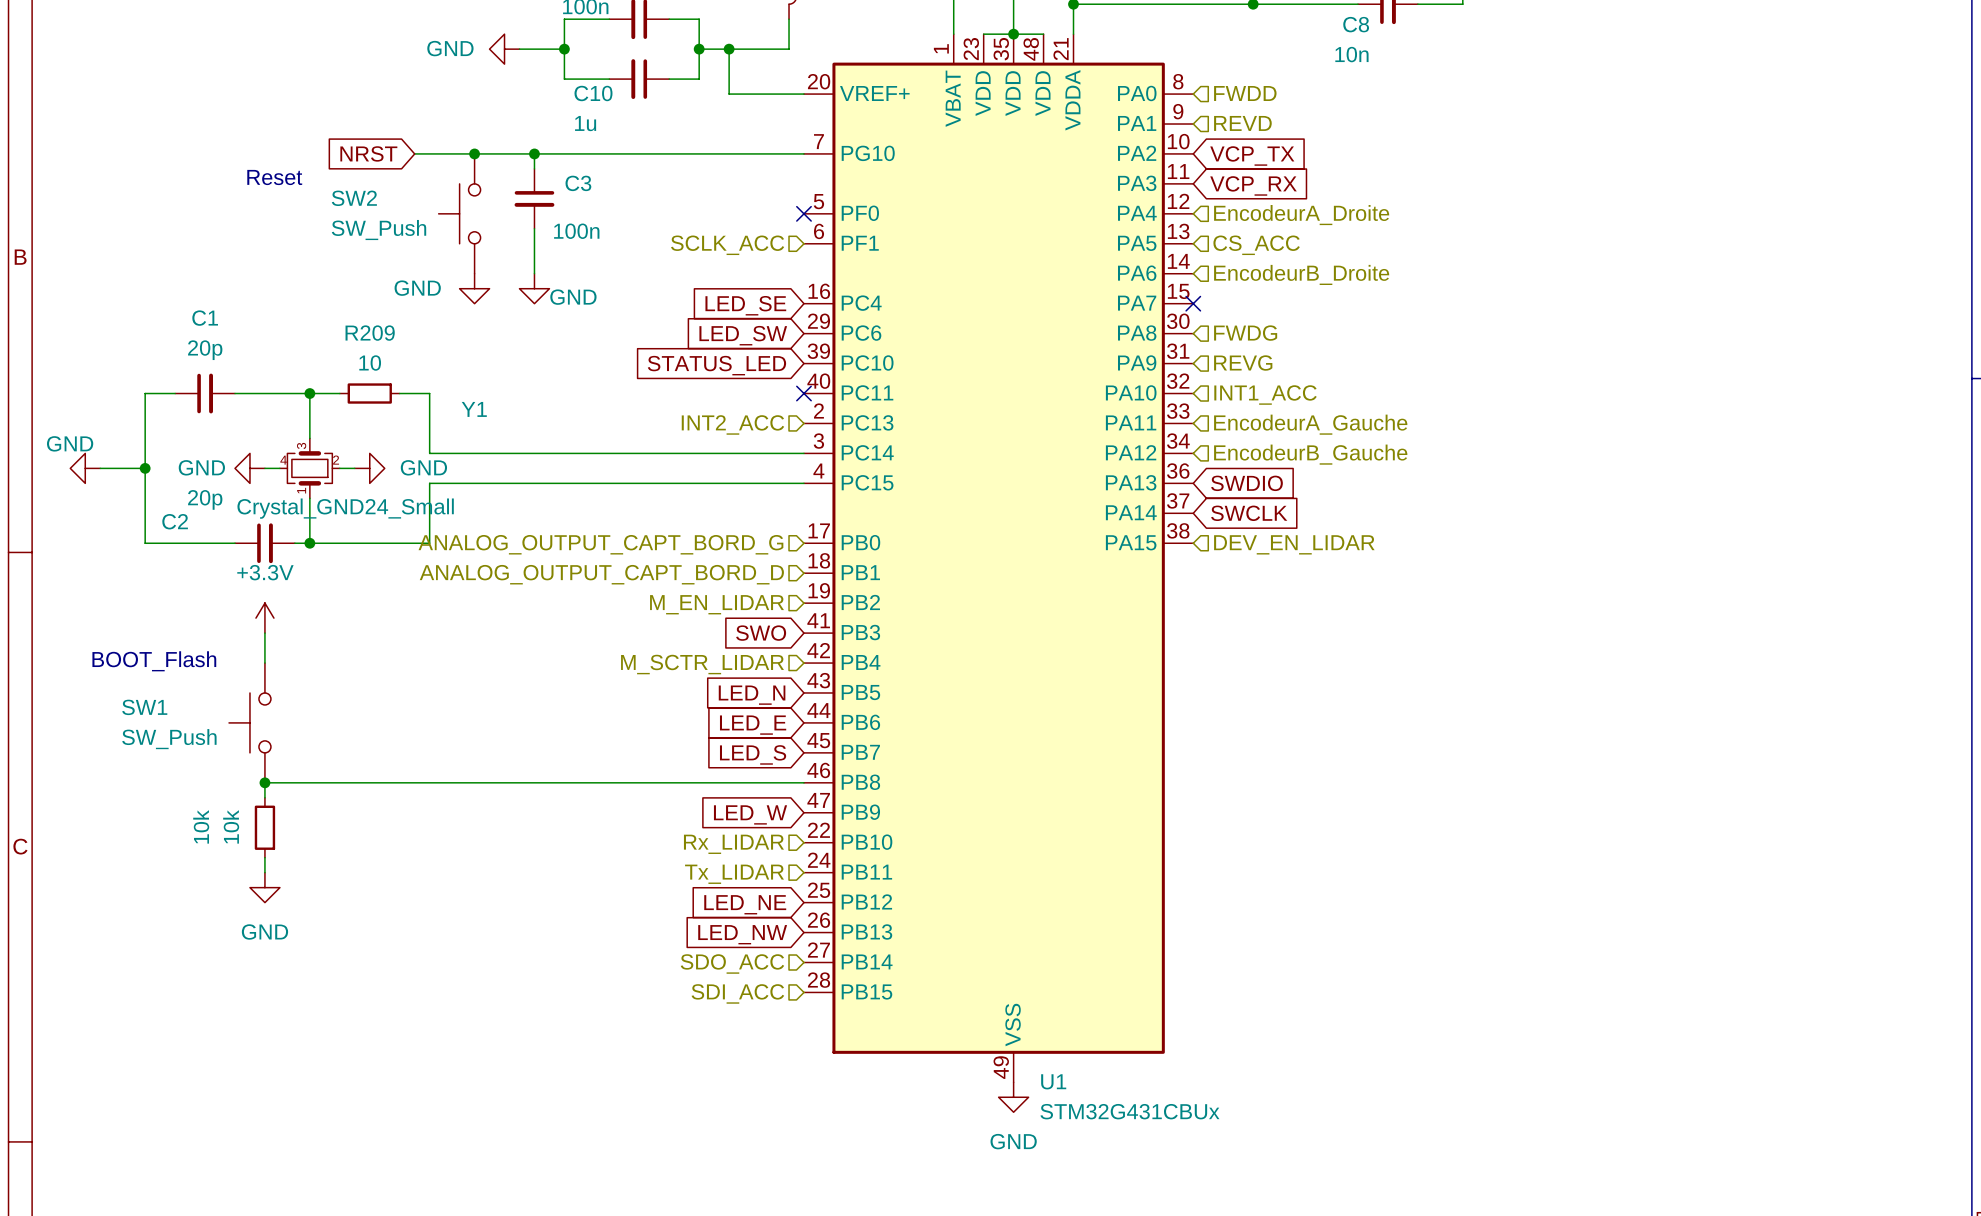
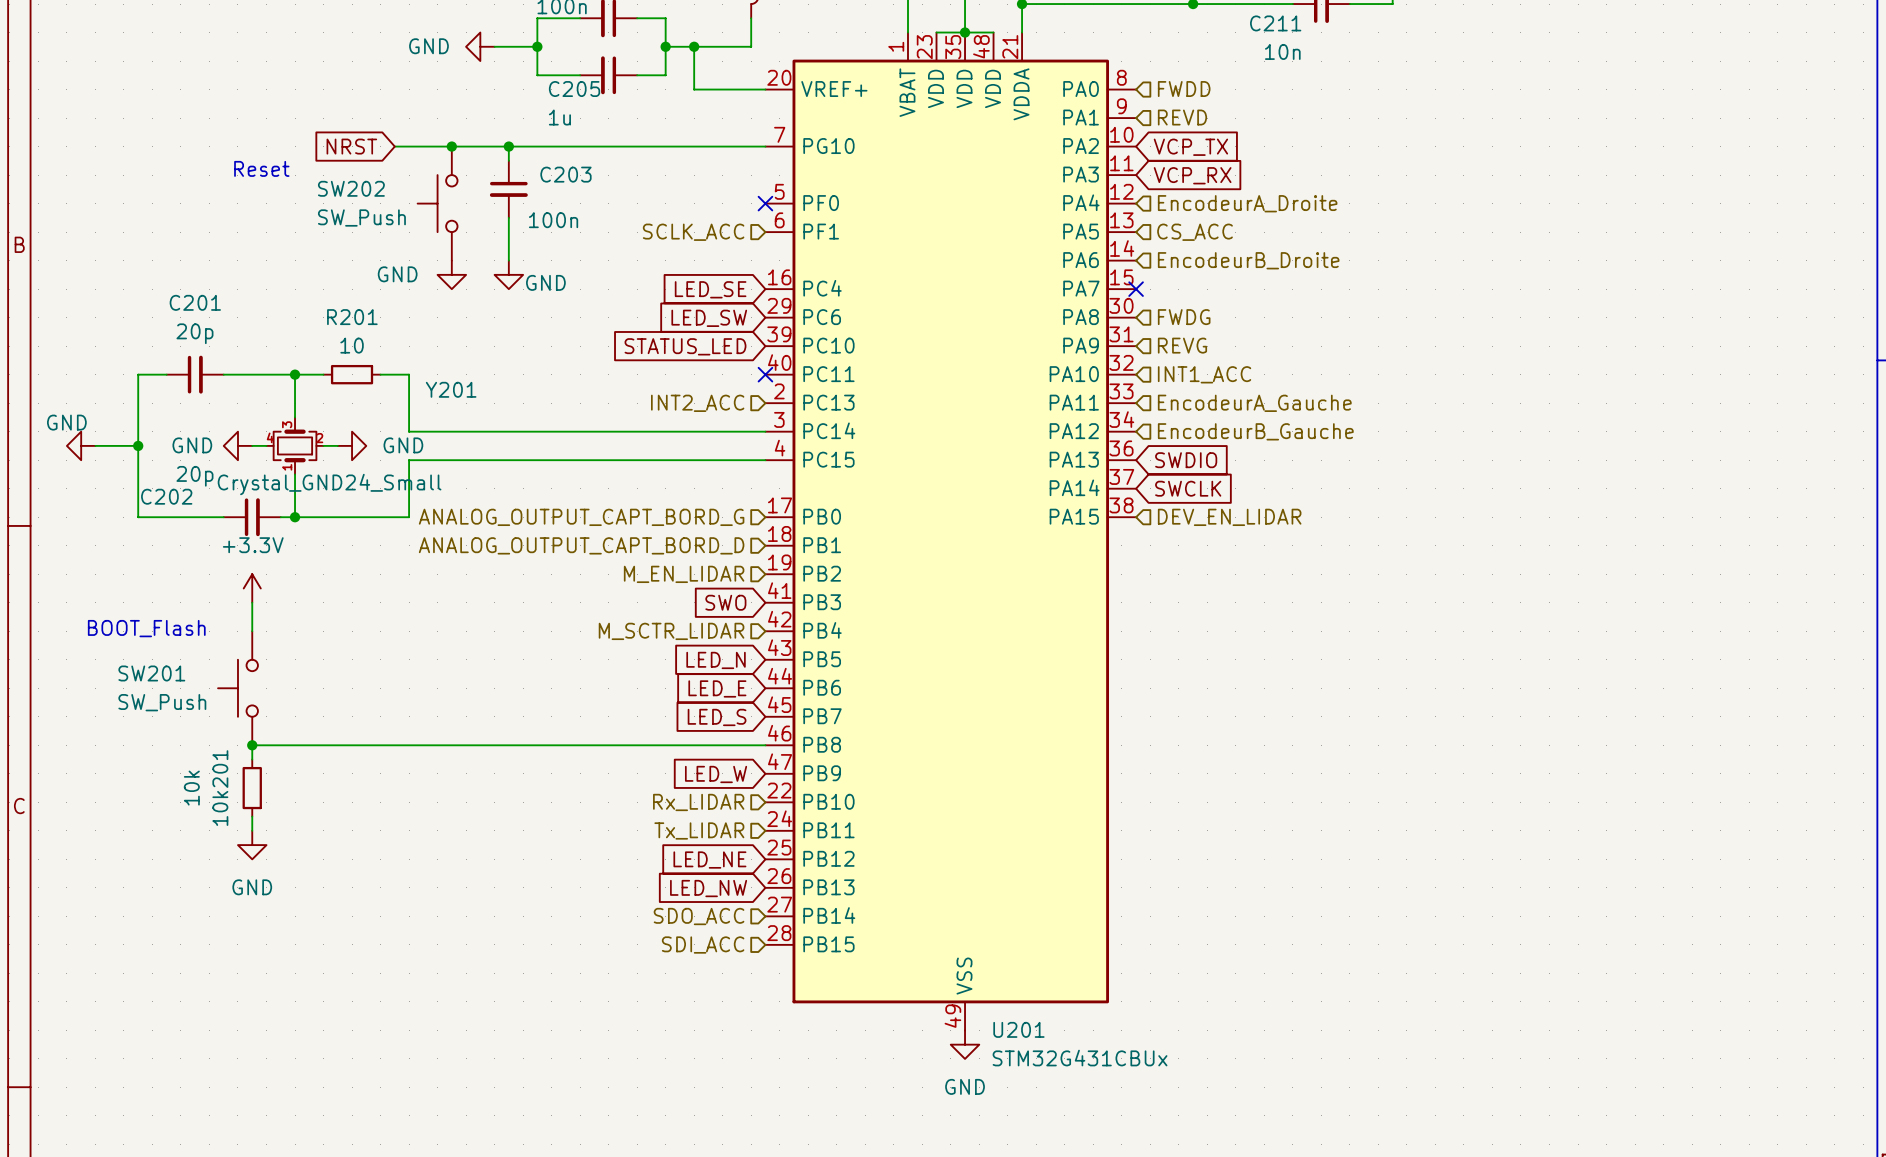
C8 name: C8 (1356, 24) -> C211 (1275, 23)
C10 name: C10 (593, 93) -> C205 (574, 89)
C3 name: C3 (578, 183) -> C203 (565, 174)
SW2 name: SW2 (354, 198) -> SW202 (351, 188)
C1 name: C1 (205, 318) -> C201 (195, 302)
R209 name: R209 (370, 333) -> R201 (352, 317)
Y1 name: Y1 (474, 409) -> Y201 (451, 389)
C2 name: C2 (175, 521) -> C202 (166, 496)
SW1 name: SW1 (144, 707) -> SW201 (151, 673)
10k name: 10k (231, 826) -> 10k201 (220, 788)
U1 name: U1 (1053, 1081) -> U201 (1018, 1029)

